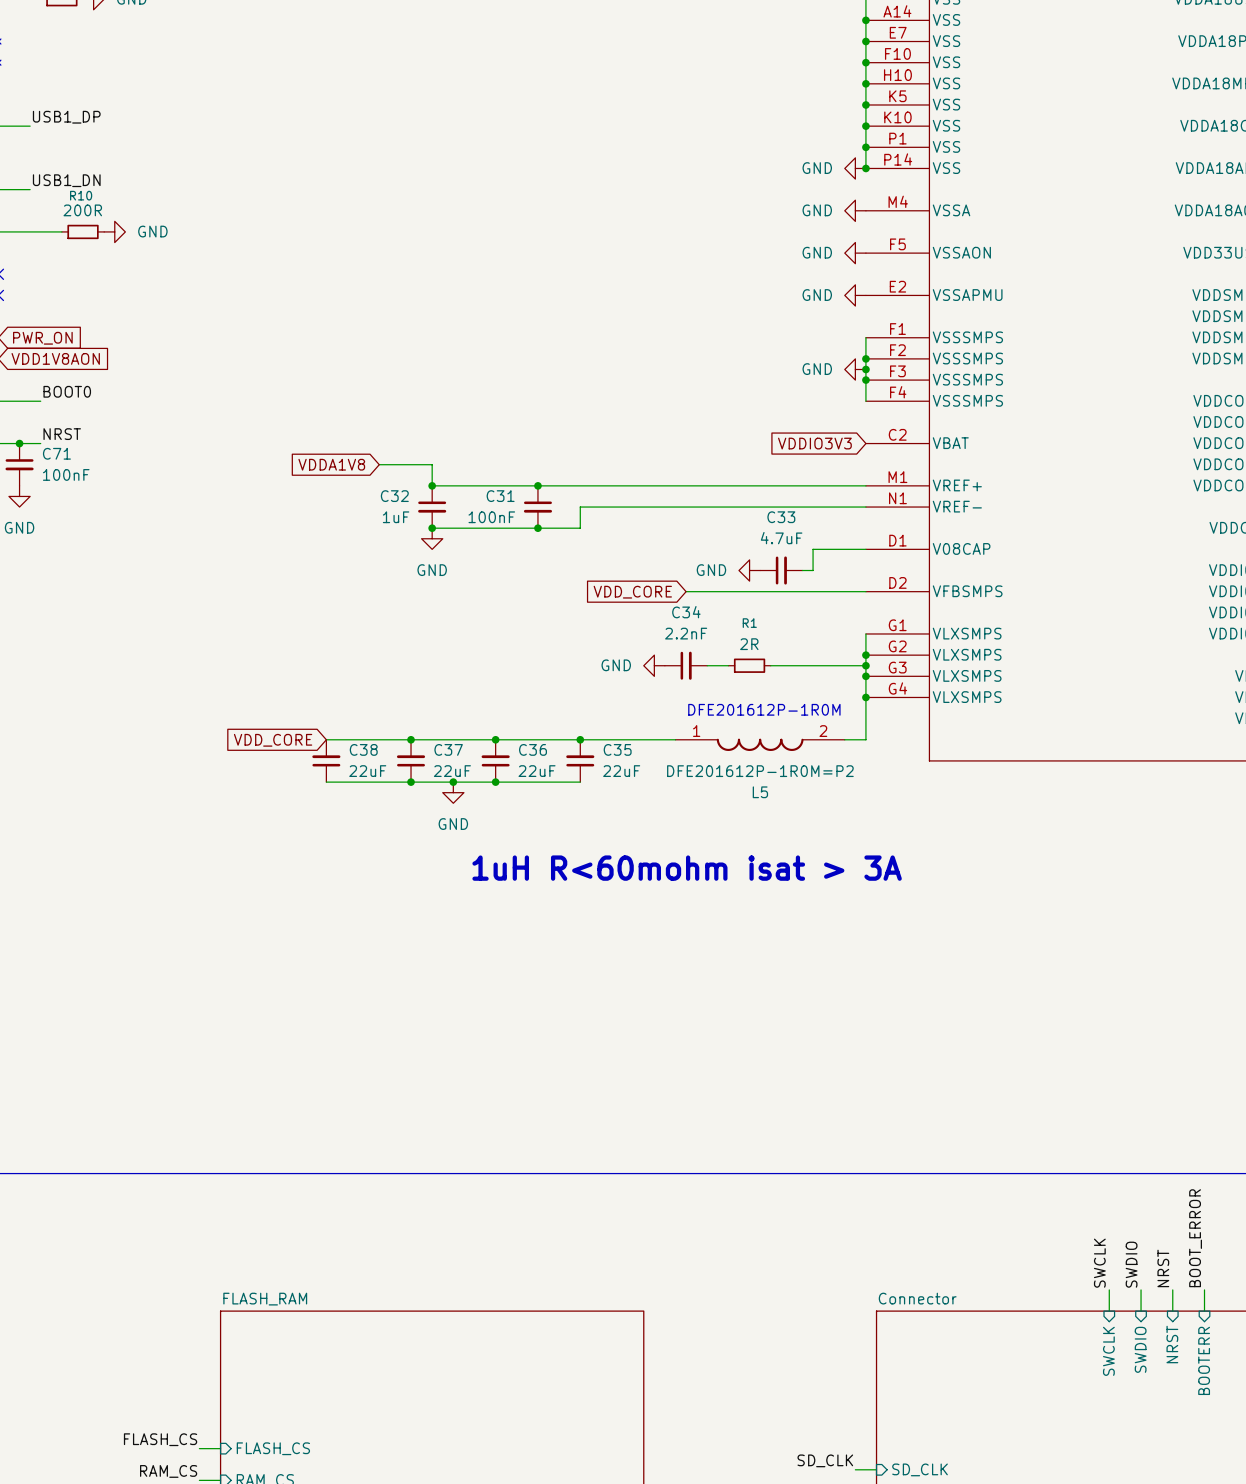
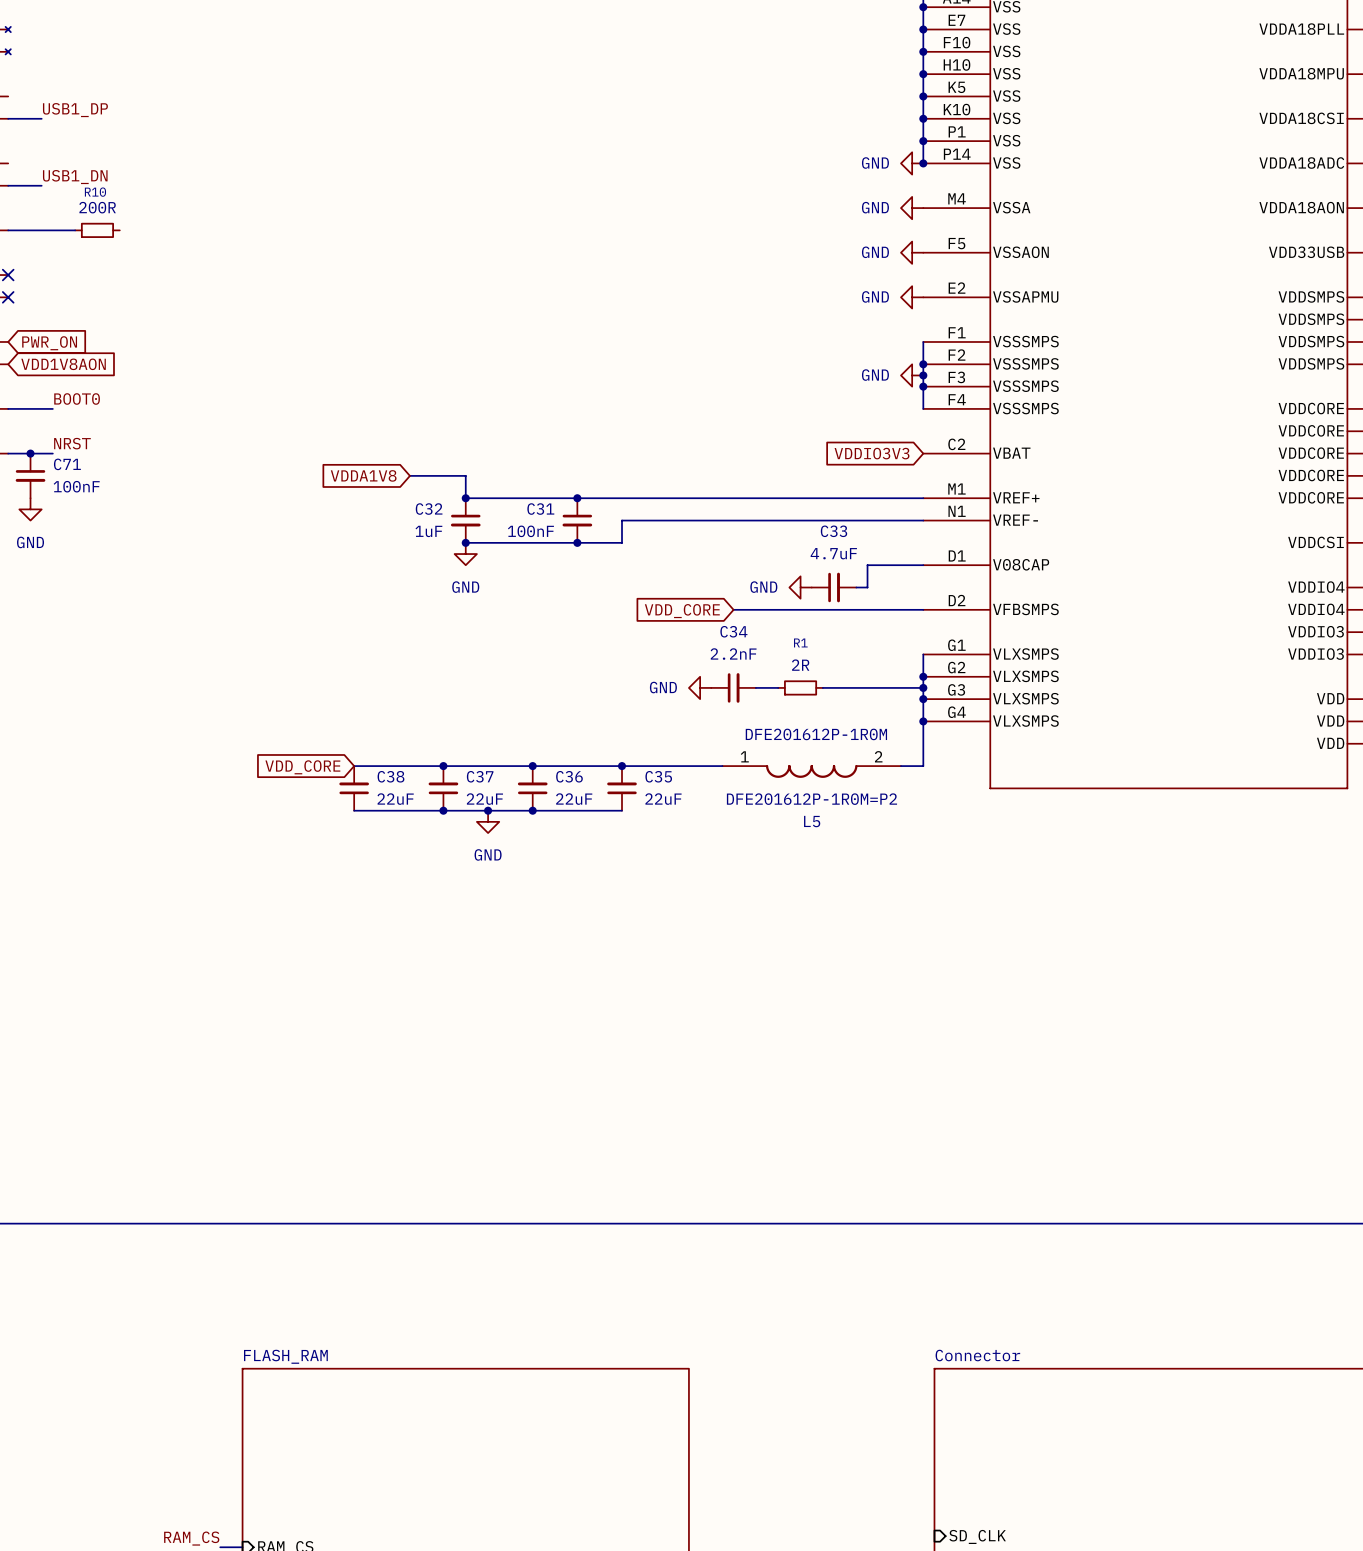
power symbol: GND (114, 231) -> none
text: 1uH R<60mohm isat > 3A (687, 868) -> none
label: BOOT_ERROR (1195, 1238) -> none
label: SWCLK (1099, 1263) -> none
label: SWDIO (1131, 1264) -> none
label: NRST (1163, 1268) -> none
wire: (1109, 1289) (1109, 1311) -> none
wire: (1141, 1289) (1141, 1311) -> none
wire: (1172, 1289) (1172, 1311) -> none
wire: (1204, 1289) (1204, 1311) -> none
sheet pin: NRST (1172, 1344) -> none
sheet pin: SWDIO (1140, 1349) -> none
sheet pin: SWCLK (1108, 1351) -> none
sheet pin: BOOTERR (1204, 1360) -> none
label: FLASH_CS (160, 1439) -> none
wire: (199, 1448) (220, 1448) -> none
sheet pin: FLASH_CS (273, 1448) -> none
label: SD_CLK (825, 1460) -> none
wire: (855, 1469) (876, 1469) -> none

